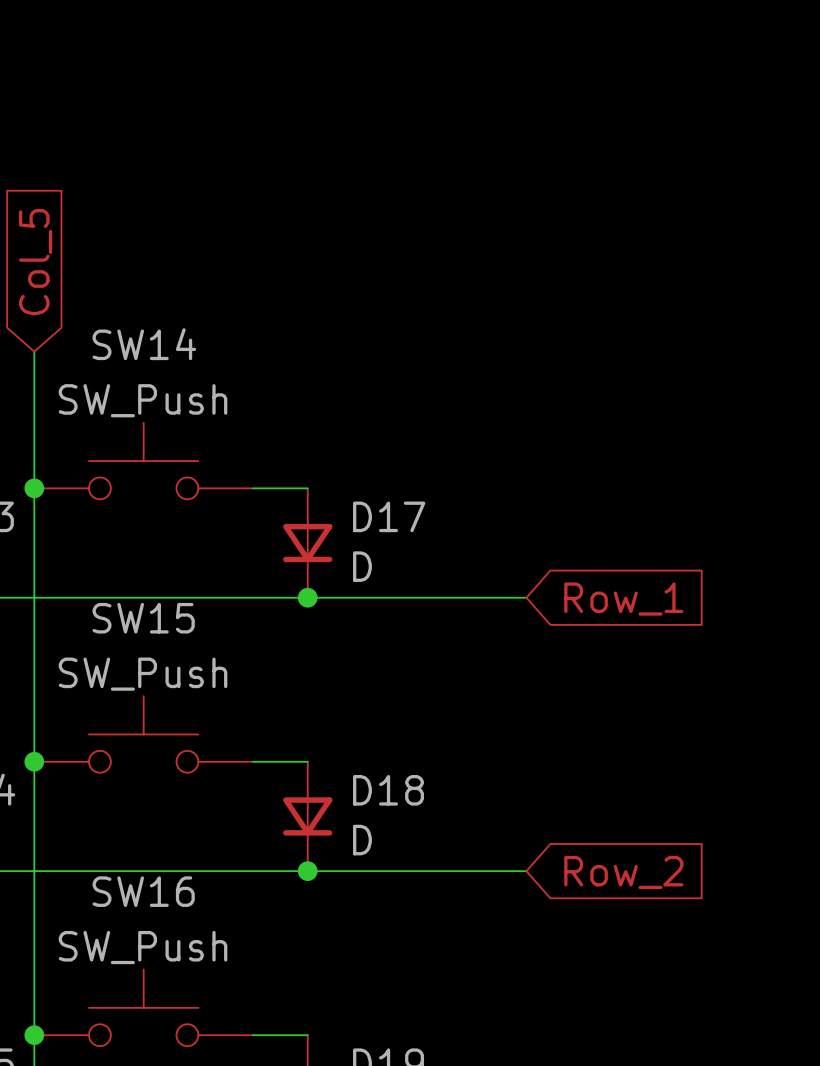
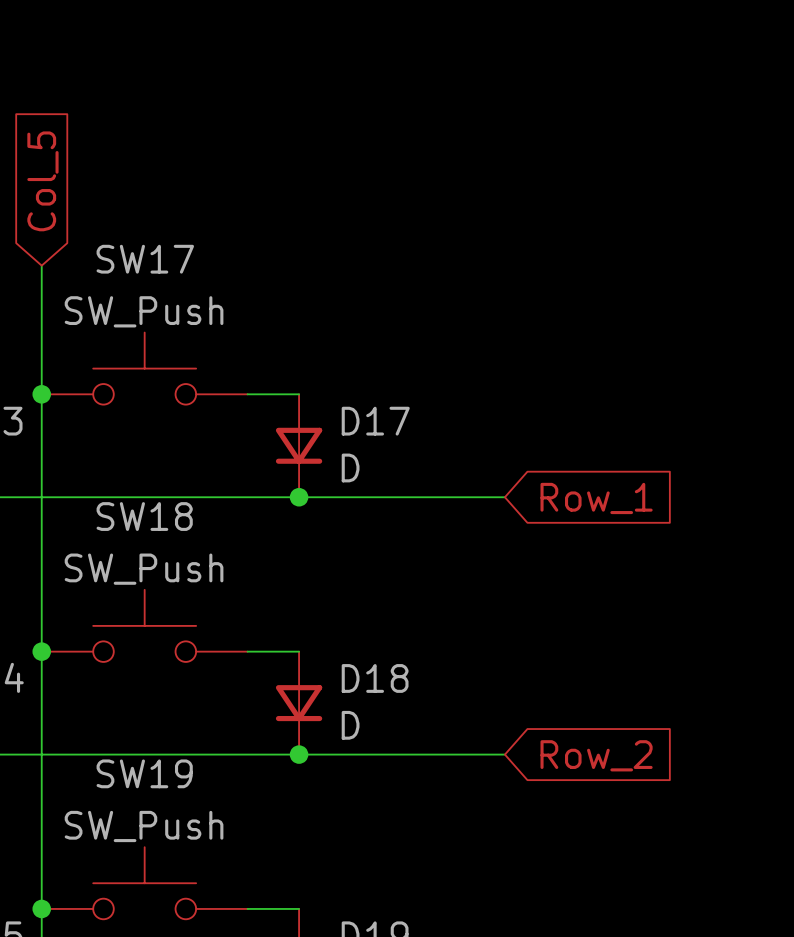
SW14 name: SW14 (144, 344) -> SW17 (145, 259)
SW15 name: SW15 (143, 618) -> SW18 (144, 516)
SW16 name: SW16 (143, 891) -> SW19 (144, 773)

